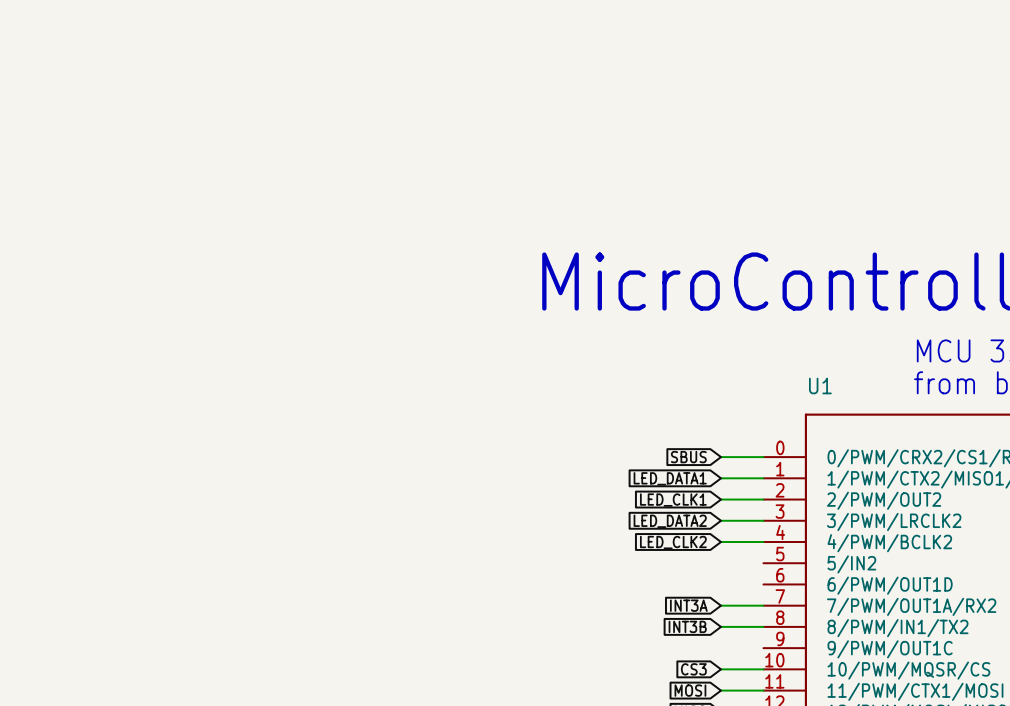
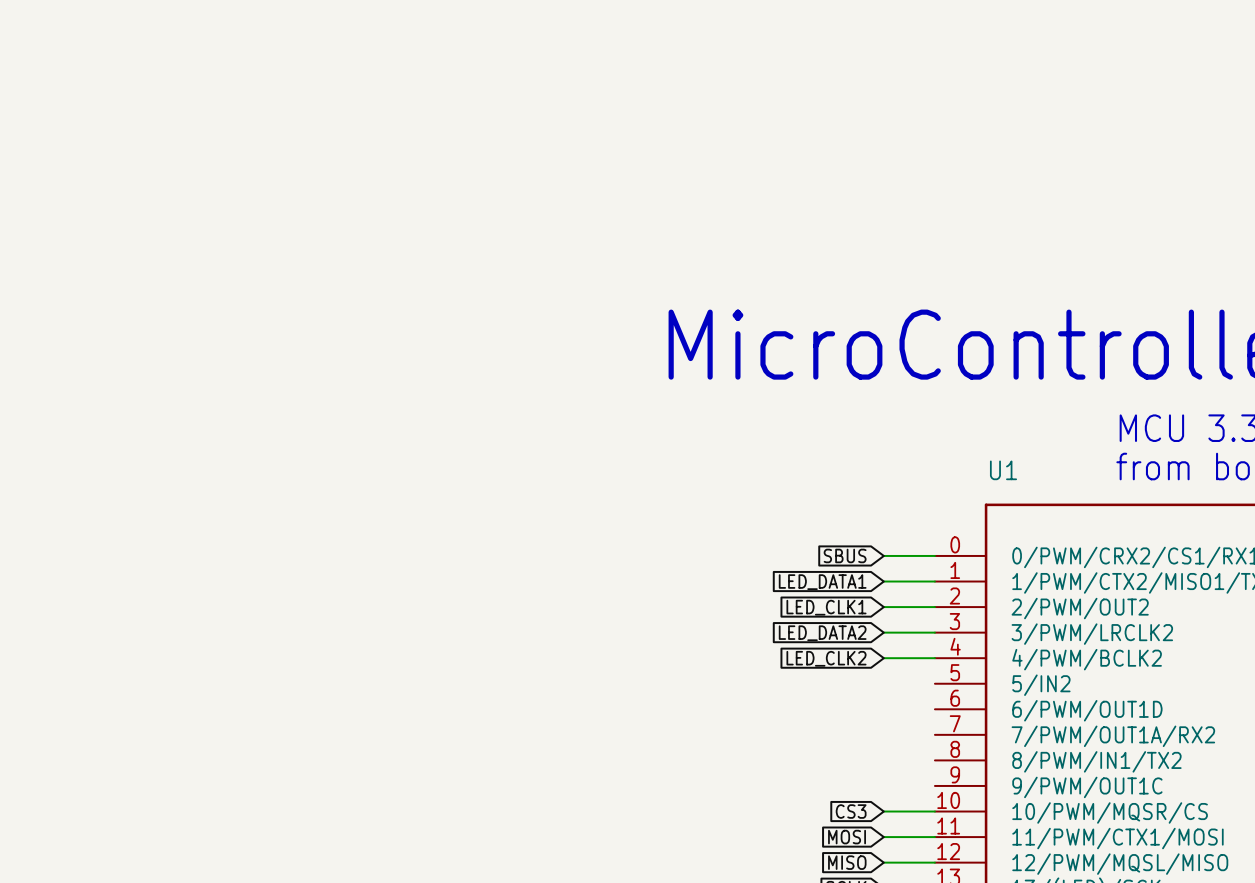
global label: INT3A (688, 605) -> none
wire: (721, 605) (763, 605) -> none
global label: INT3B (687, 626) -> none
wire: (721, 626) (763, 626) -> none

